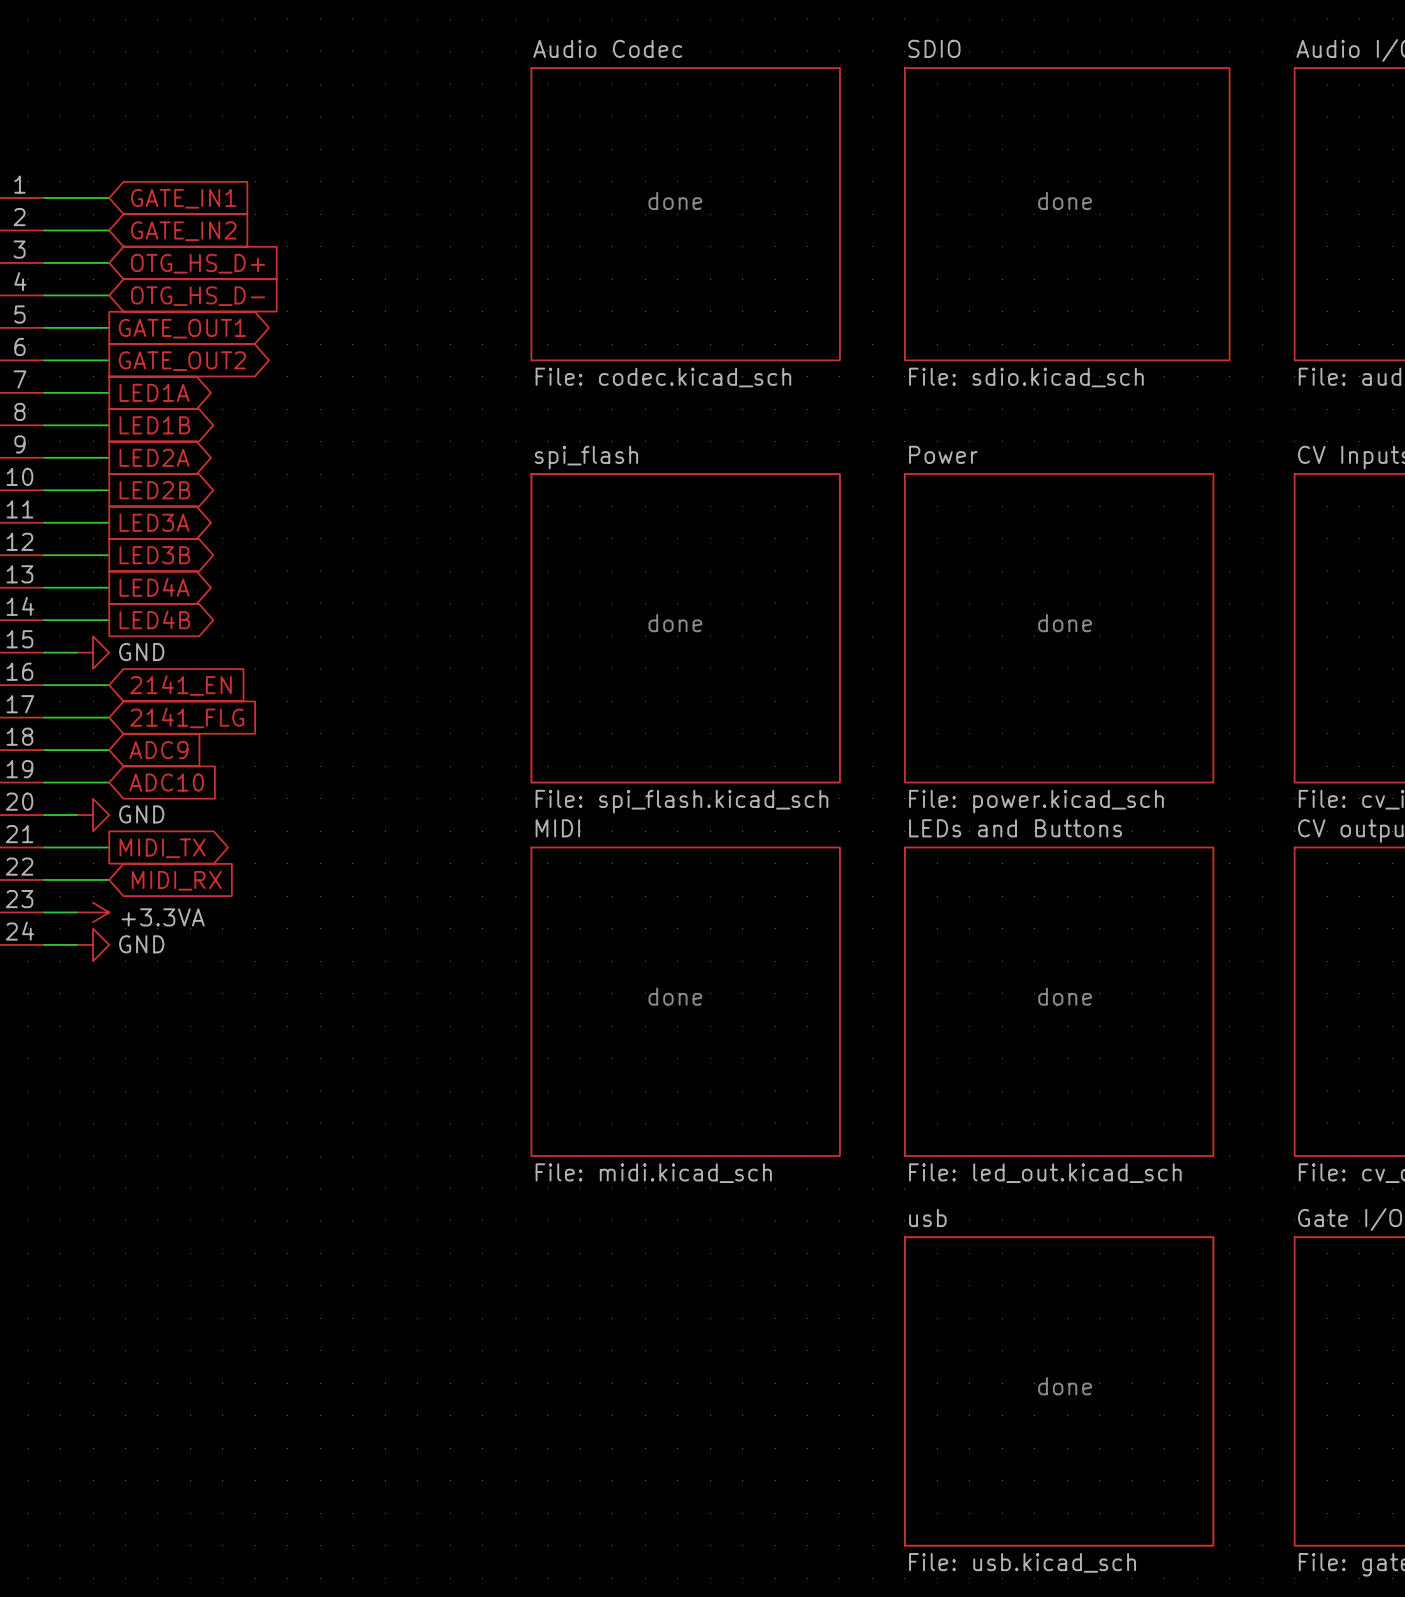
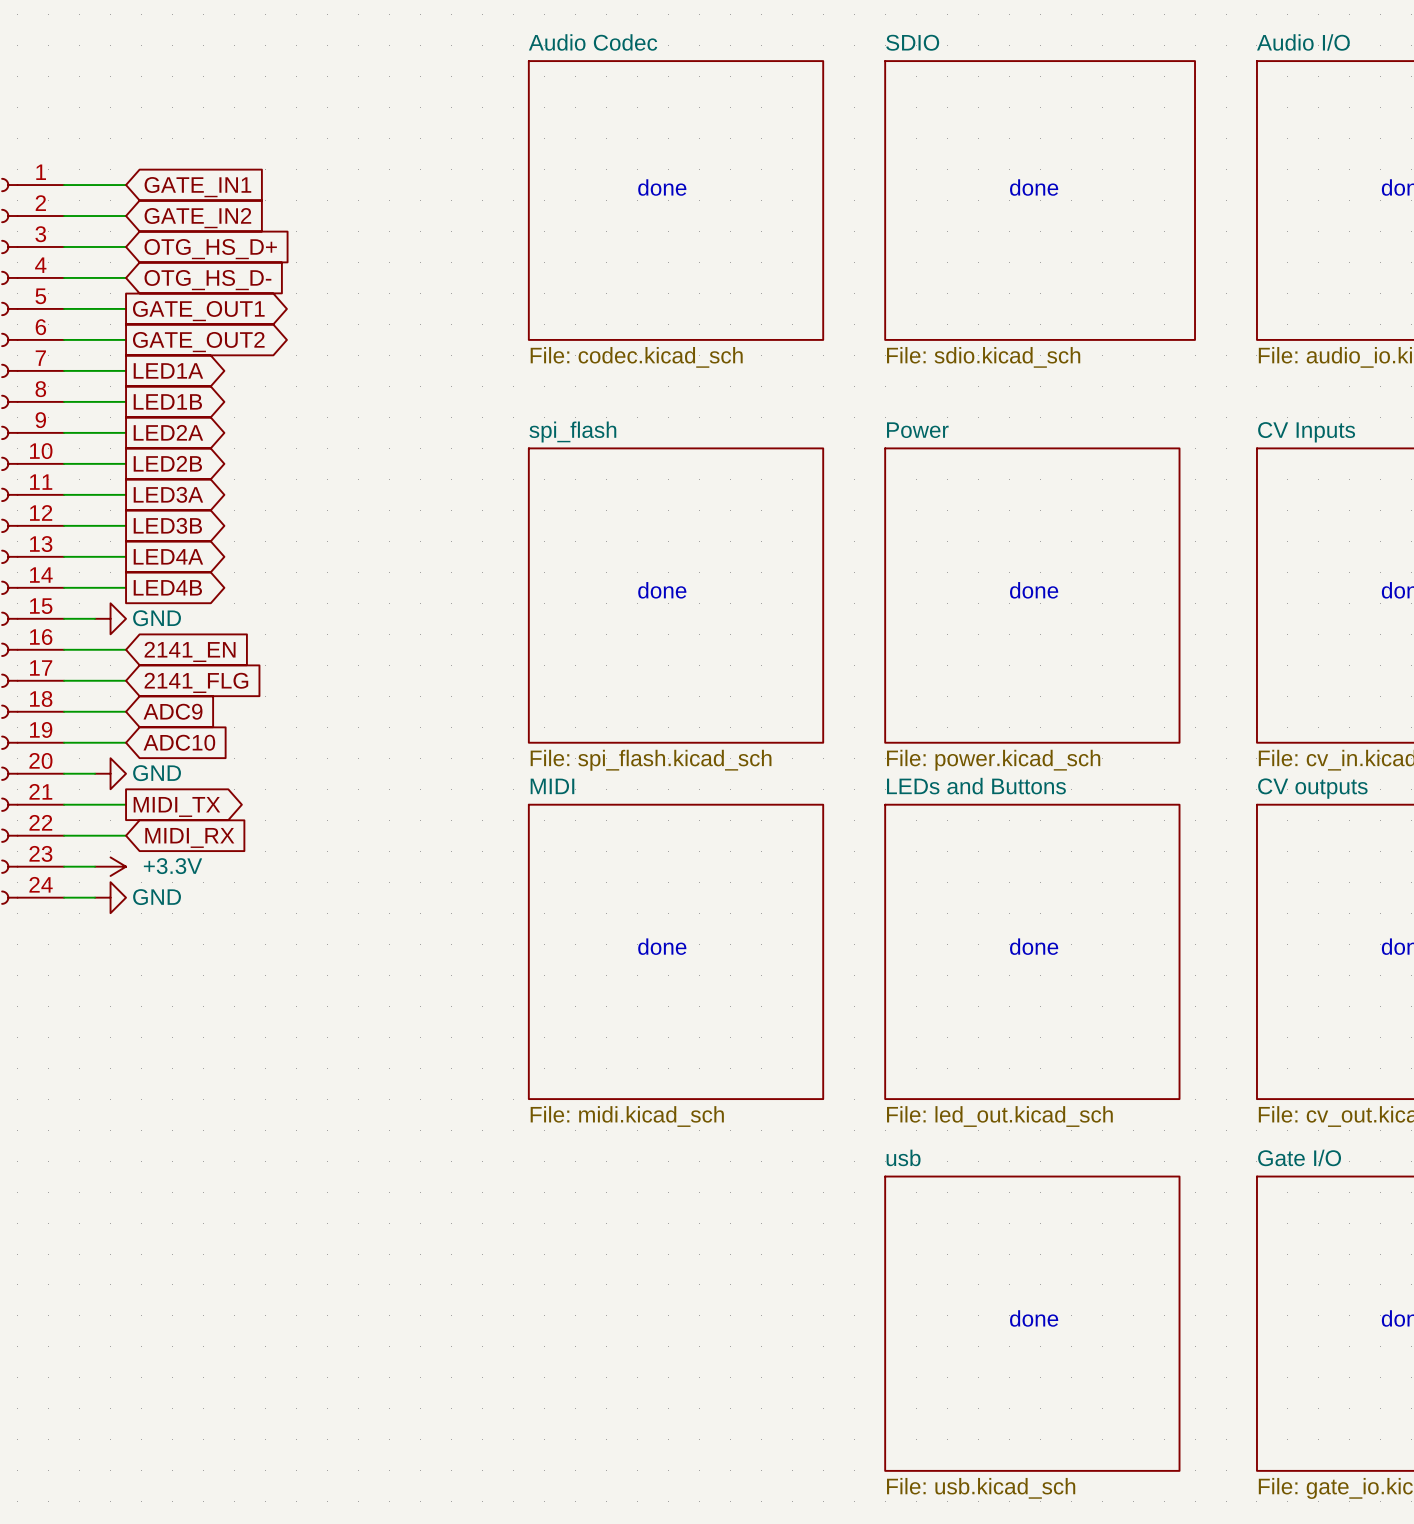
power symbol: +3.3VA (93, 912) -> +3.3V (110, 866)

